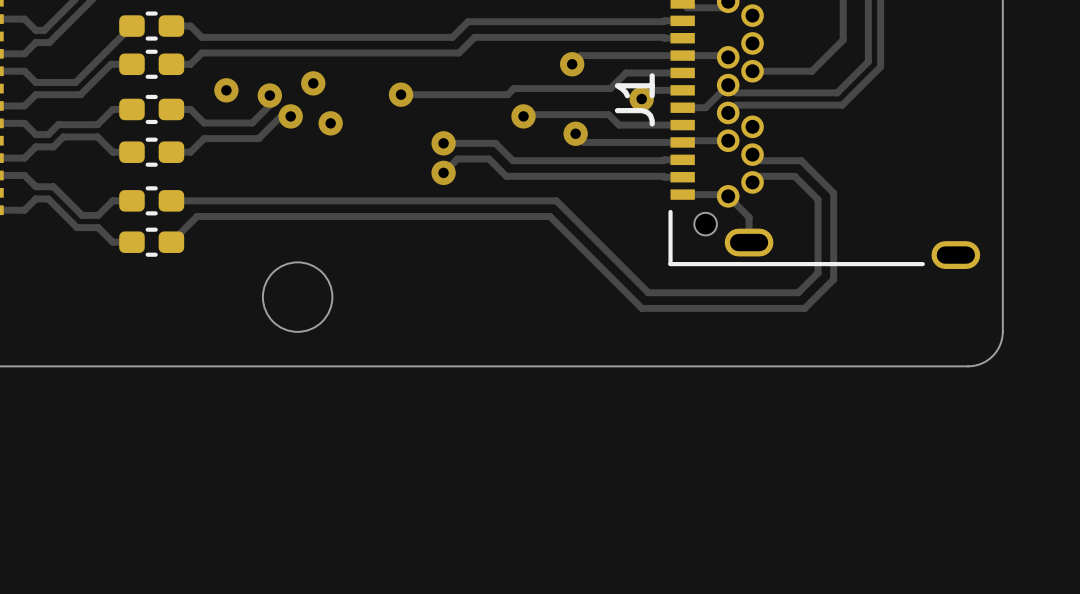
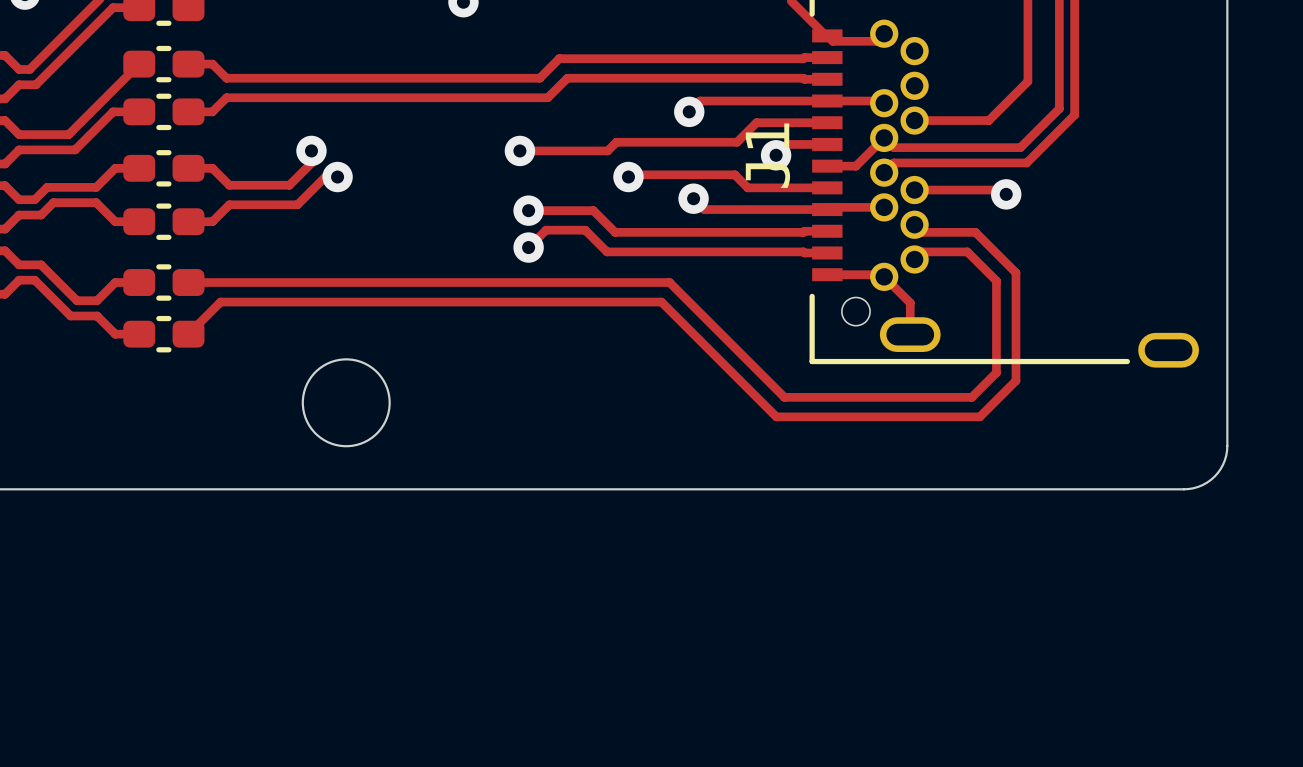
via: (313, 83) -> none
via: (226, 90) -> none
track: (401, 94) (507, 94) -> (519, 150) (608, 149)
via position: (401, 94) -> (519, 150)
via: (330, 123) -> none
track: none -> (914, 190) (1001, 190) (1006, 194)
via: none -> (1006, 194)

